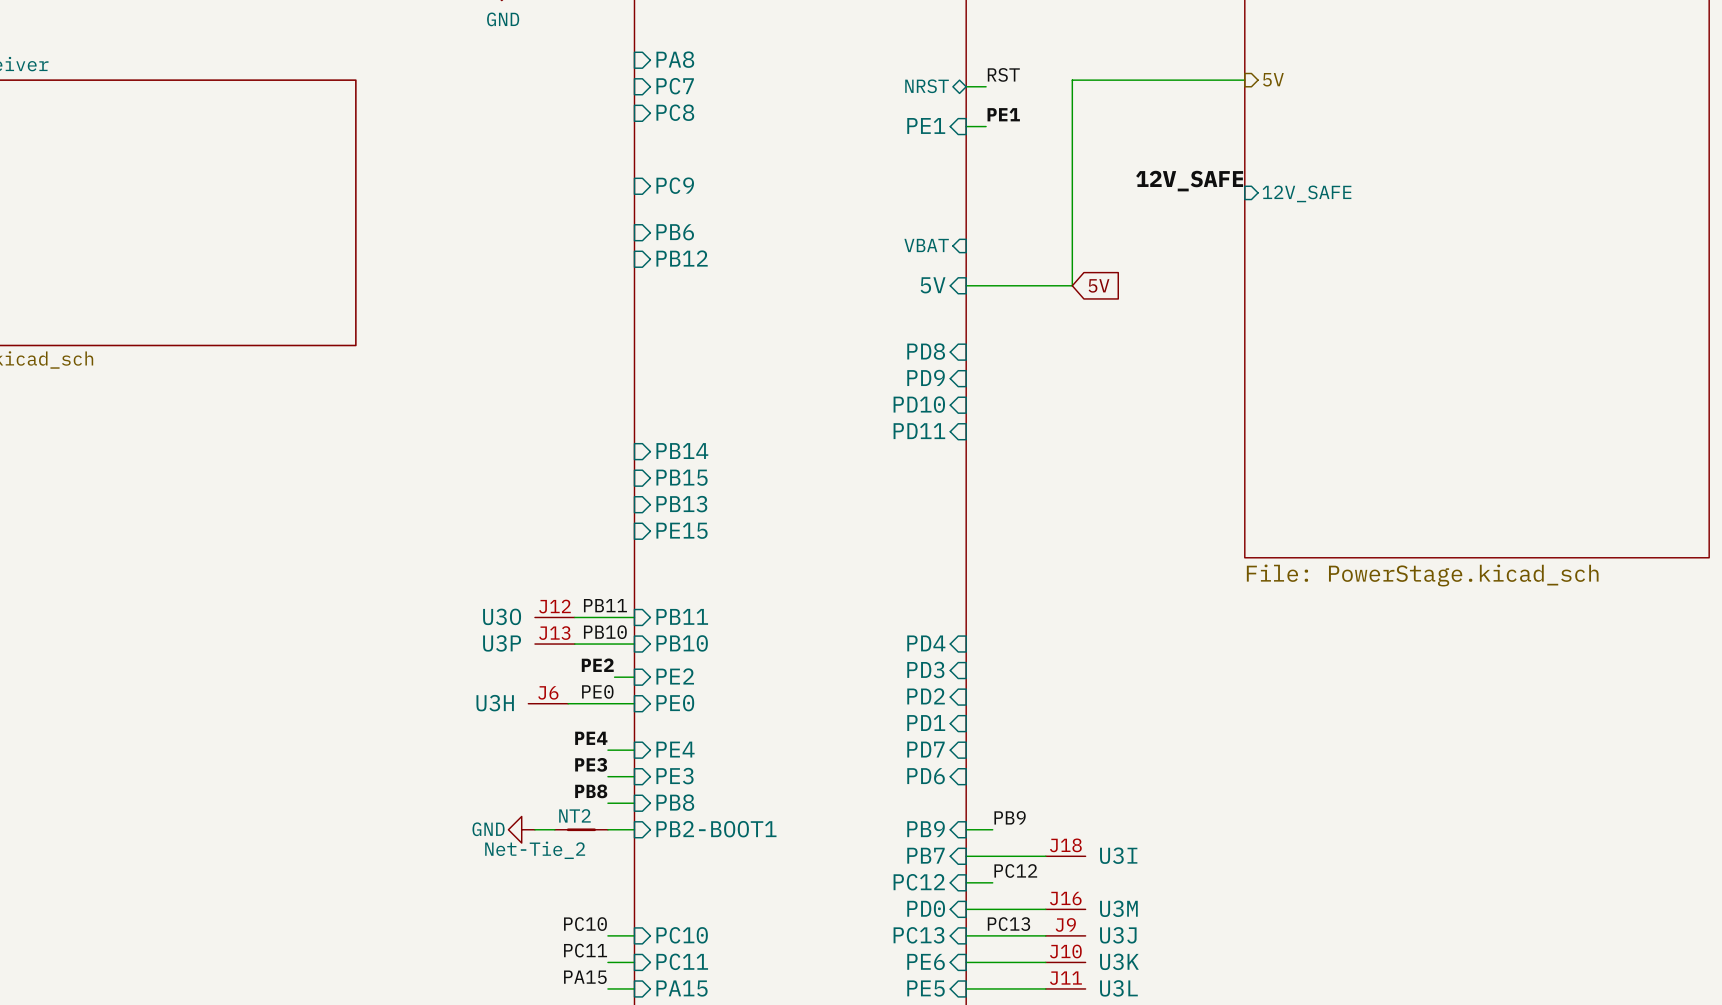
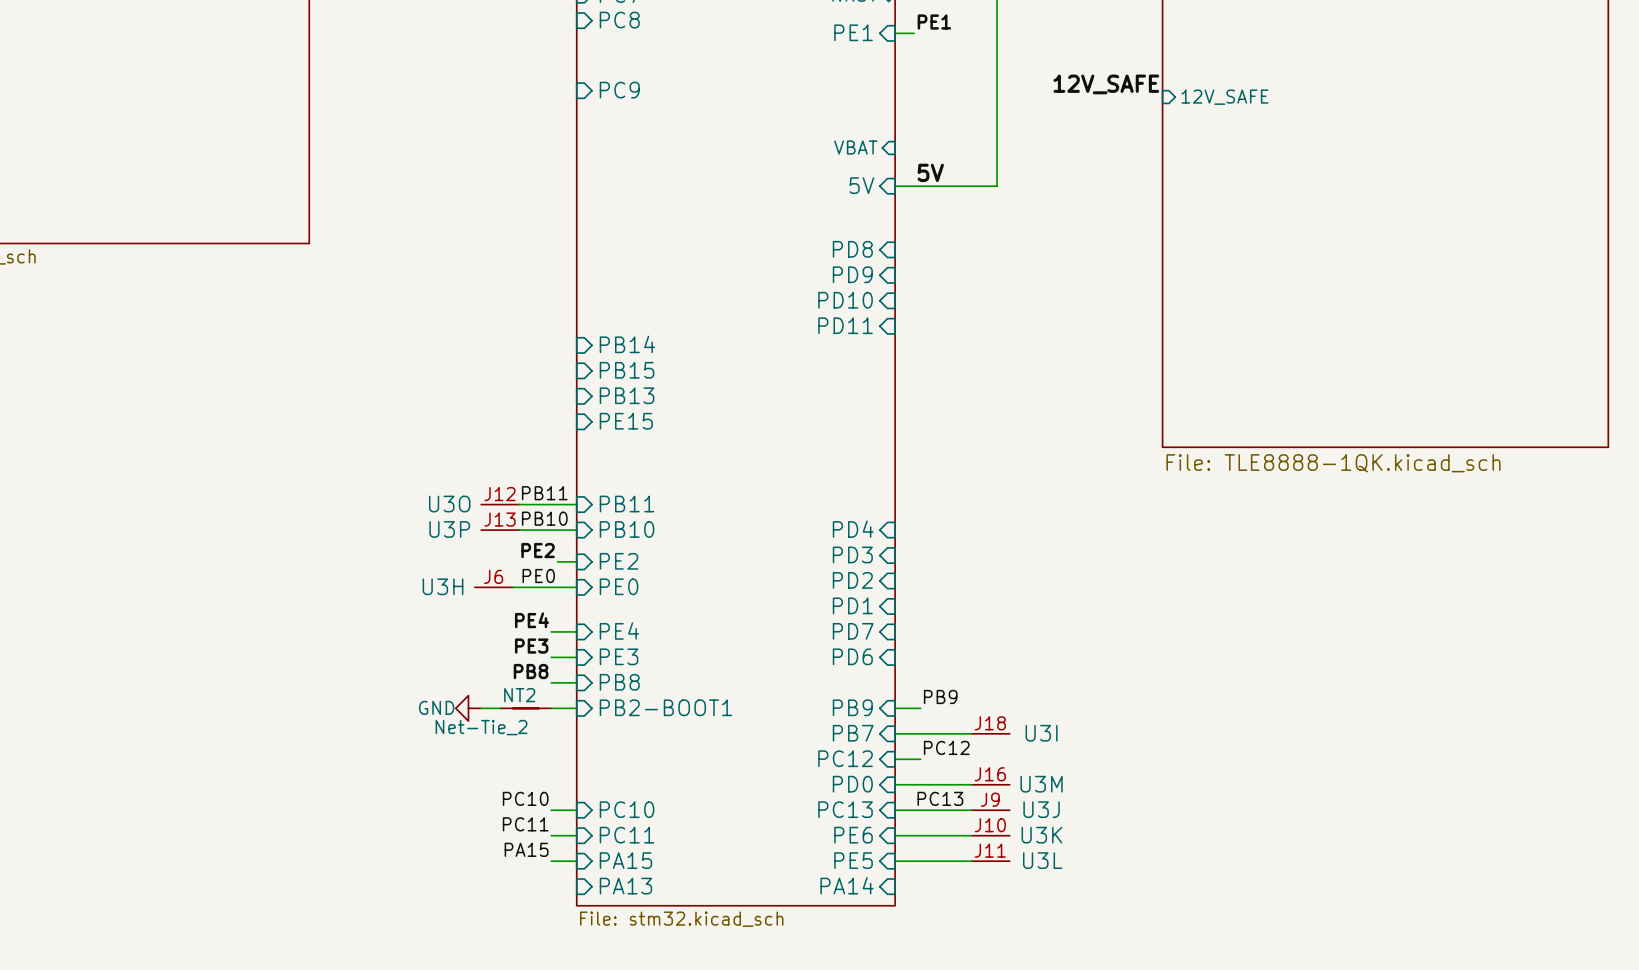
sheet pin: PB6 (675, 232) -> none
sheet pin: PB12 (682, 258) -> none
label: none -> 5V (930, 172)
global label: 5V (1099, 285) -> none
sheet value: File: PowerStage.kicad_sch (1422, 575) -> File: TLE8888-1QK.kicad_sch (1333, 463)

